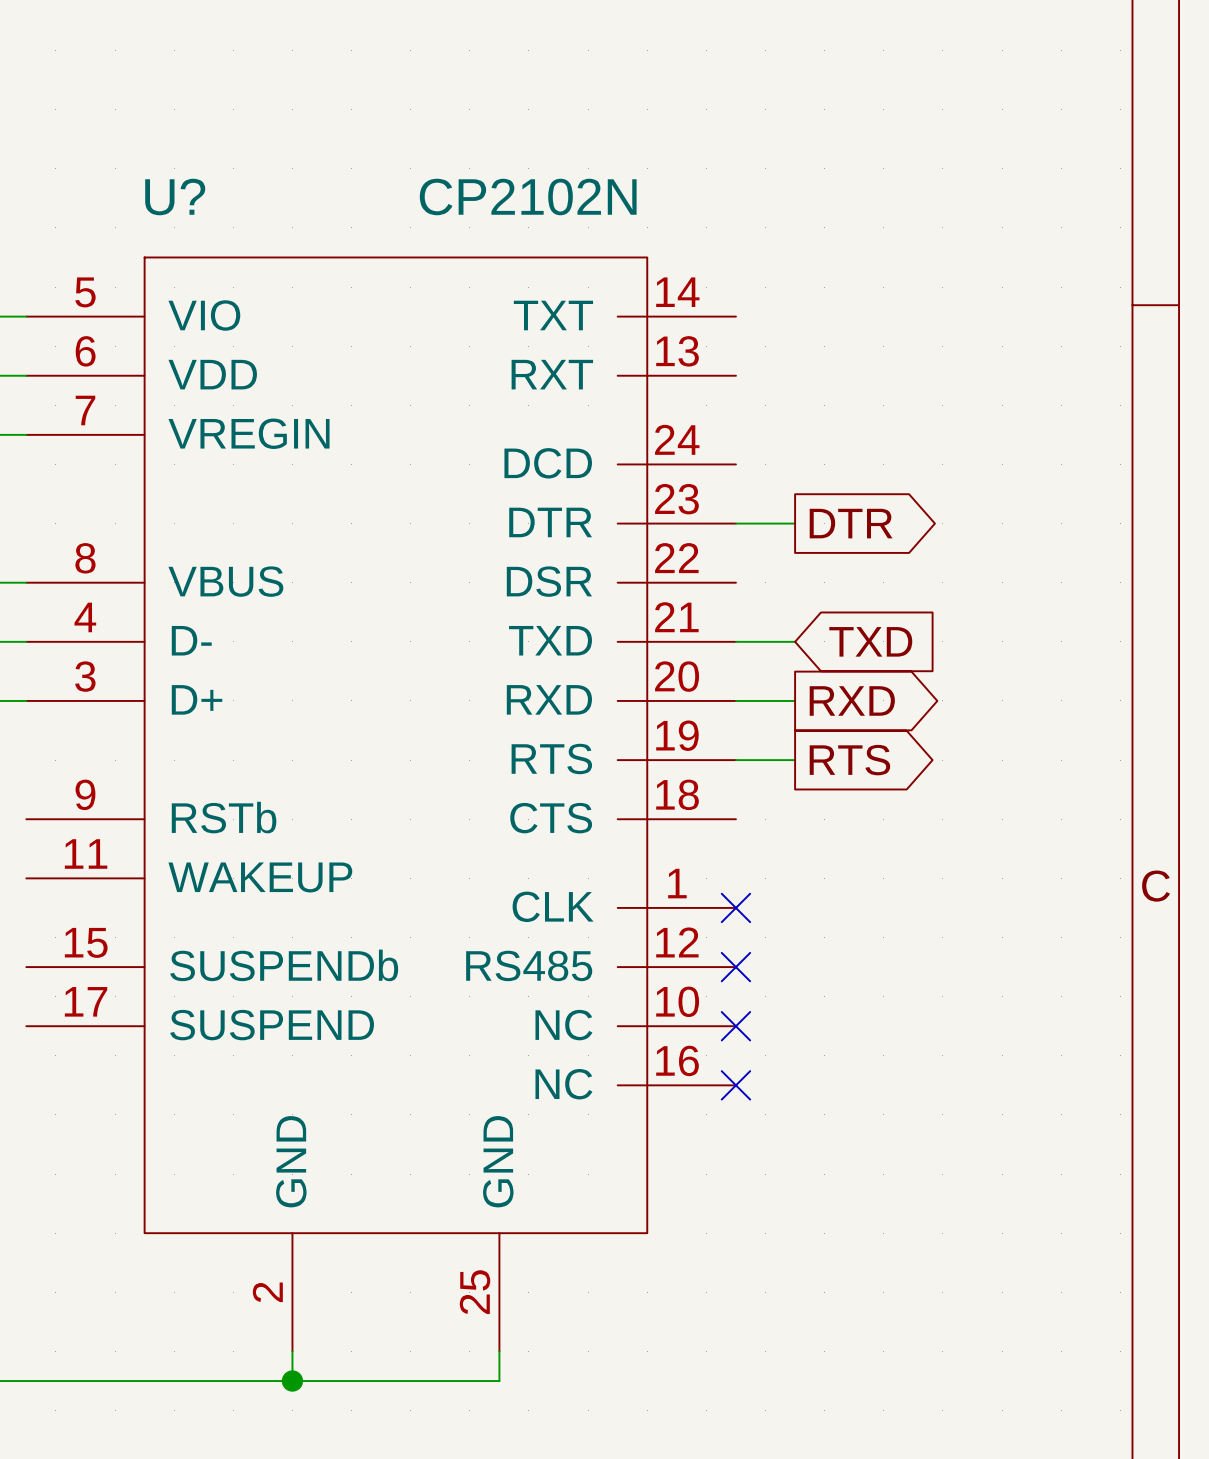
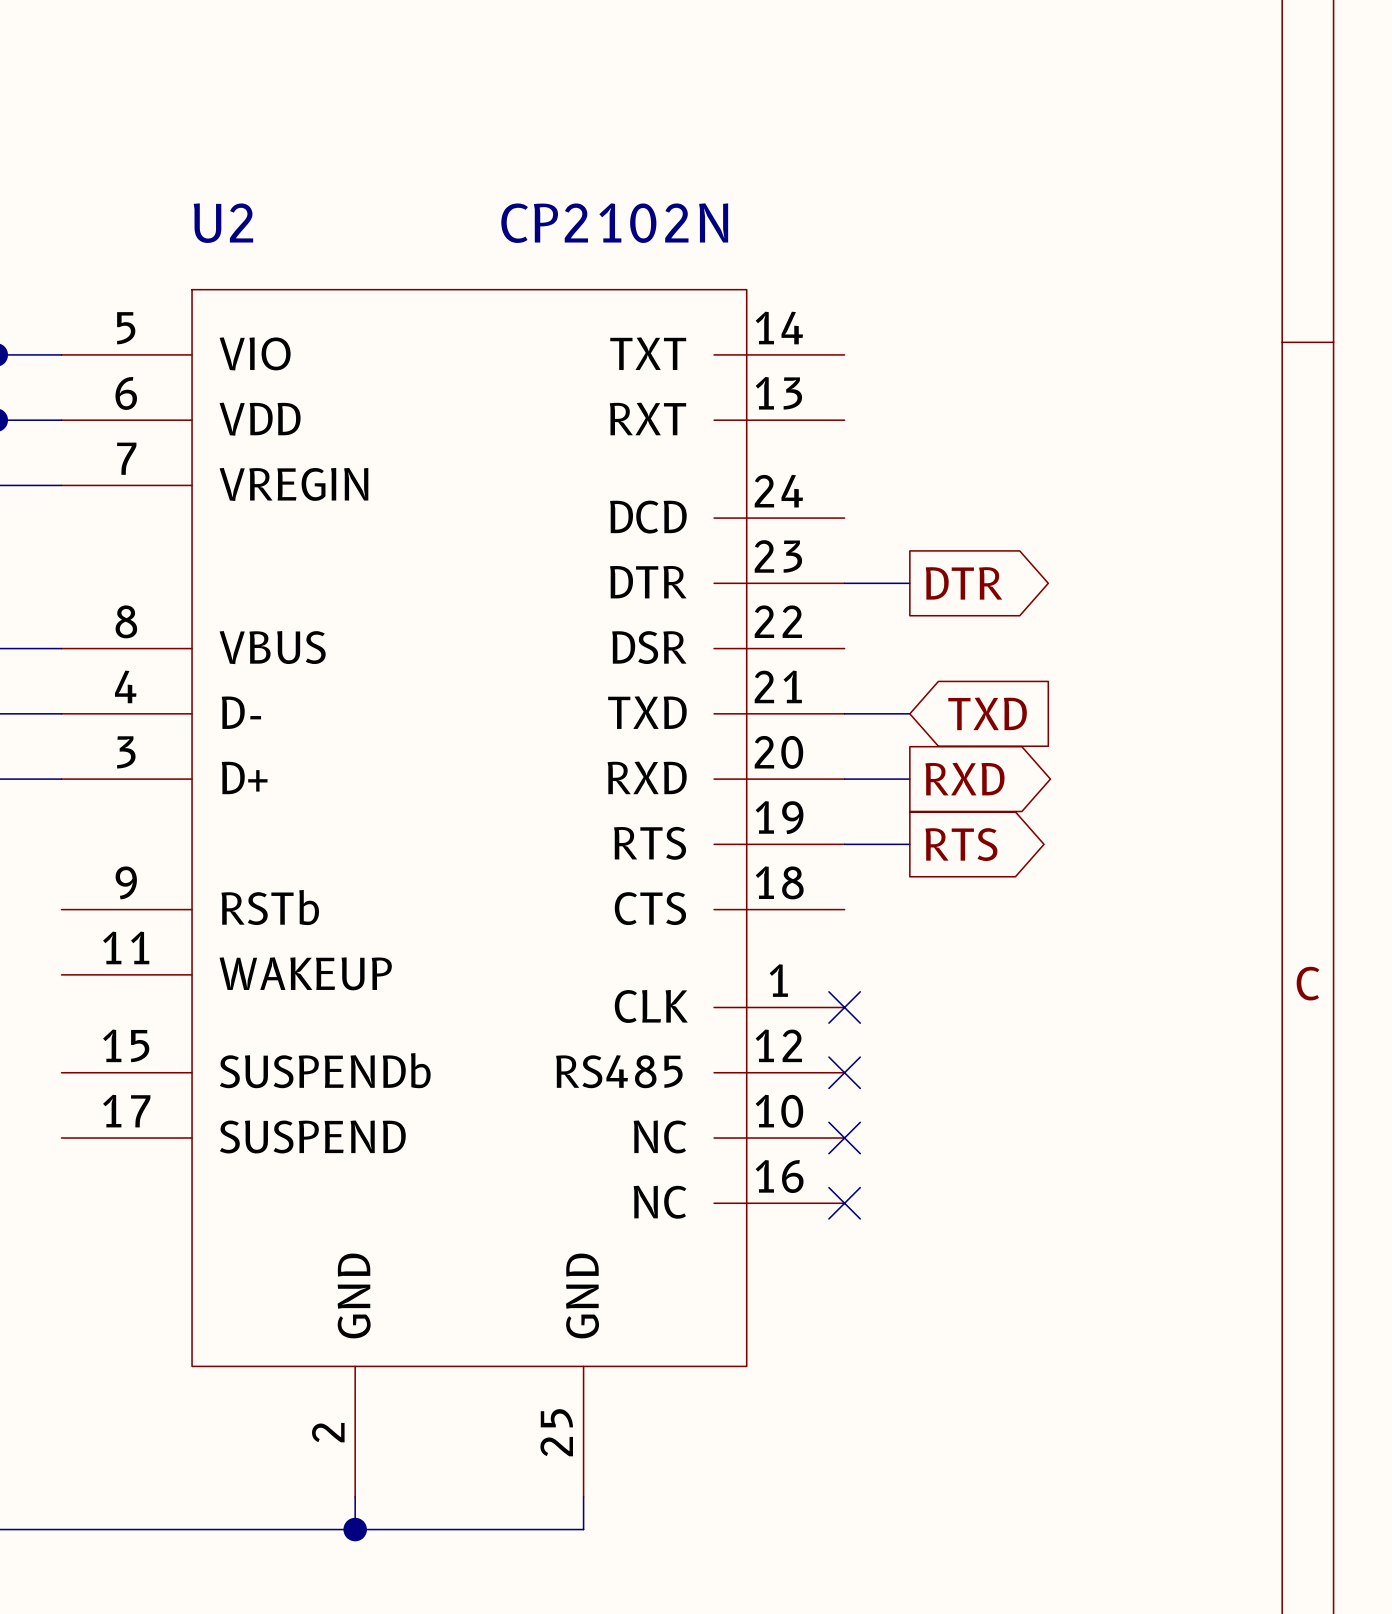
U? name: U? (175, 197) -> U2 (223, 223)

